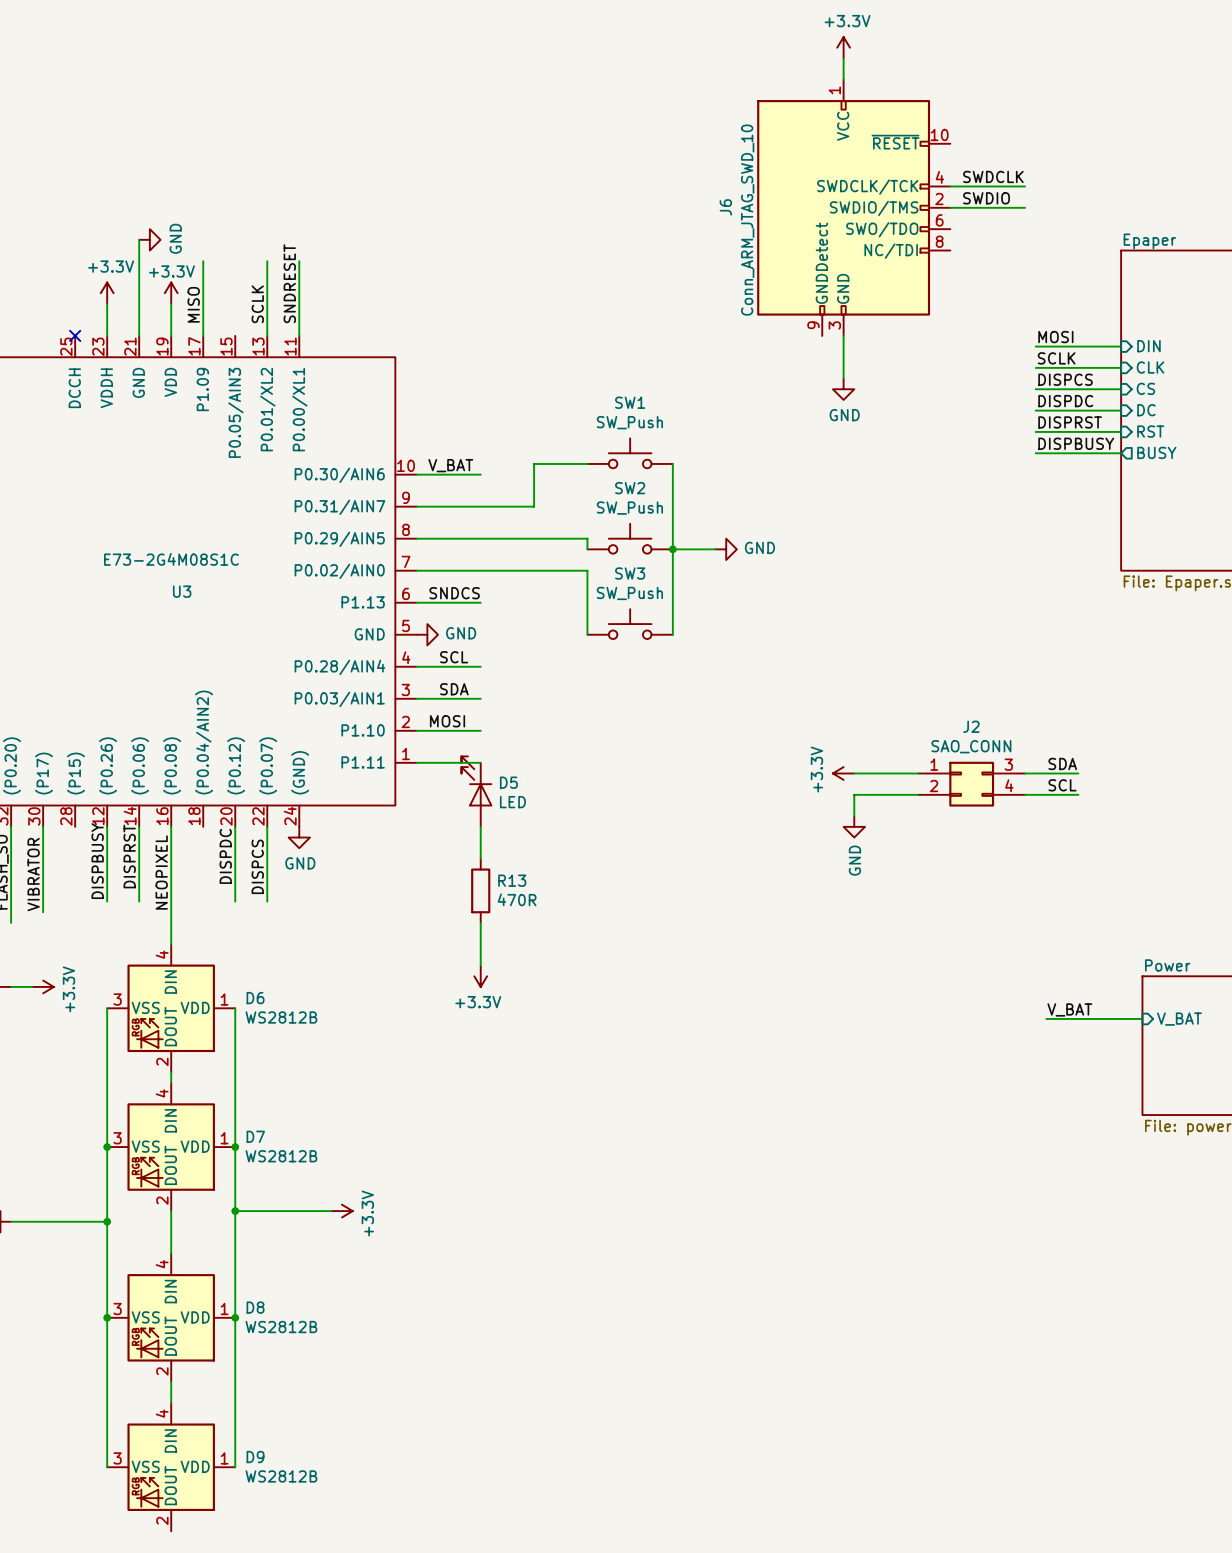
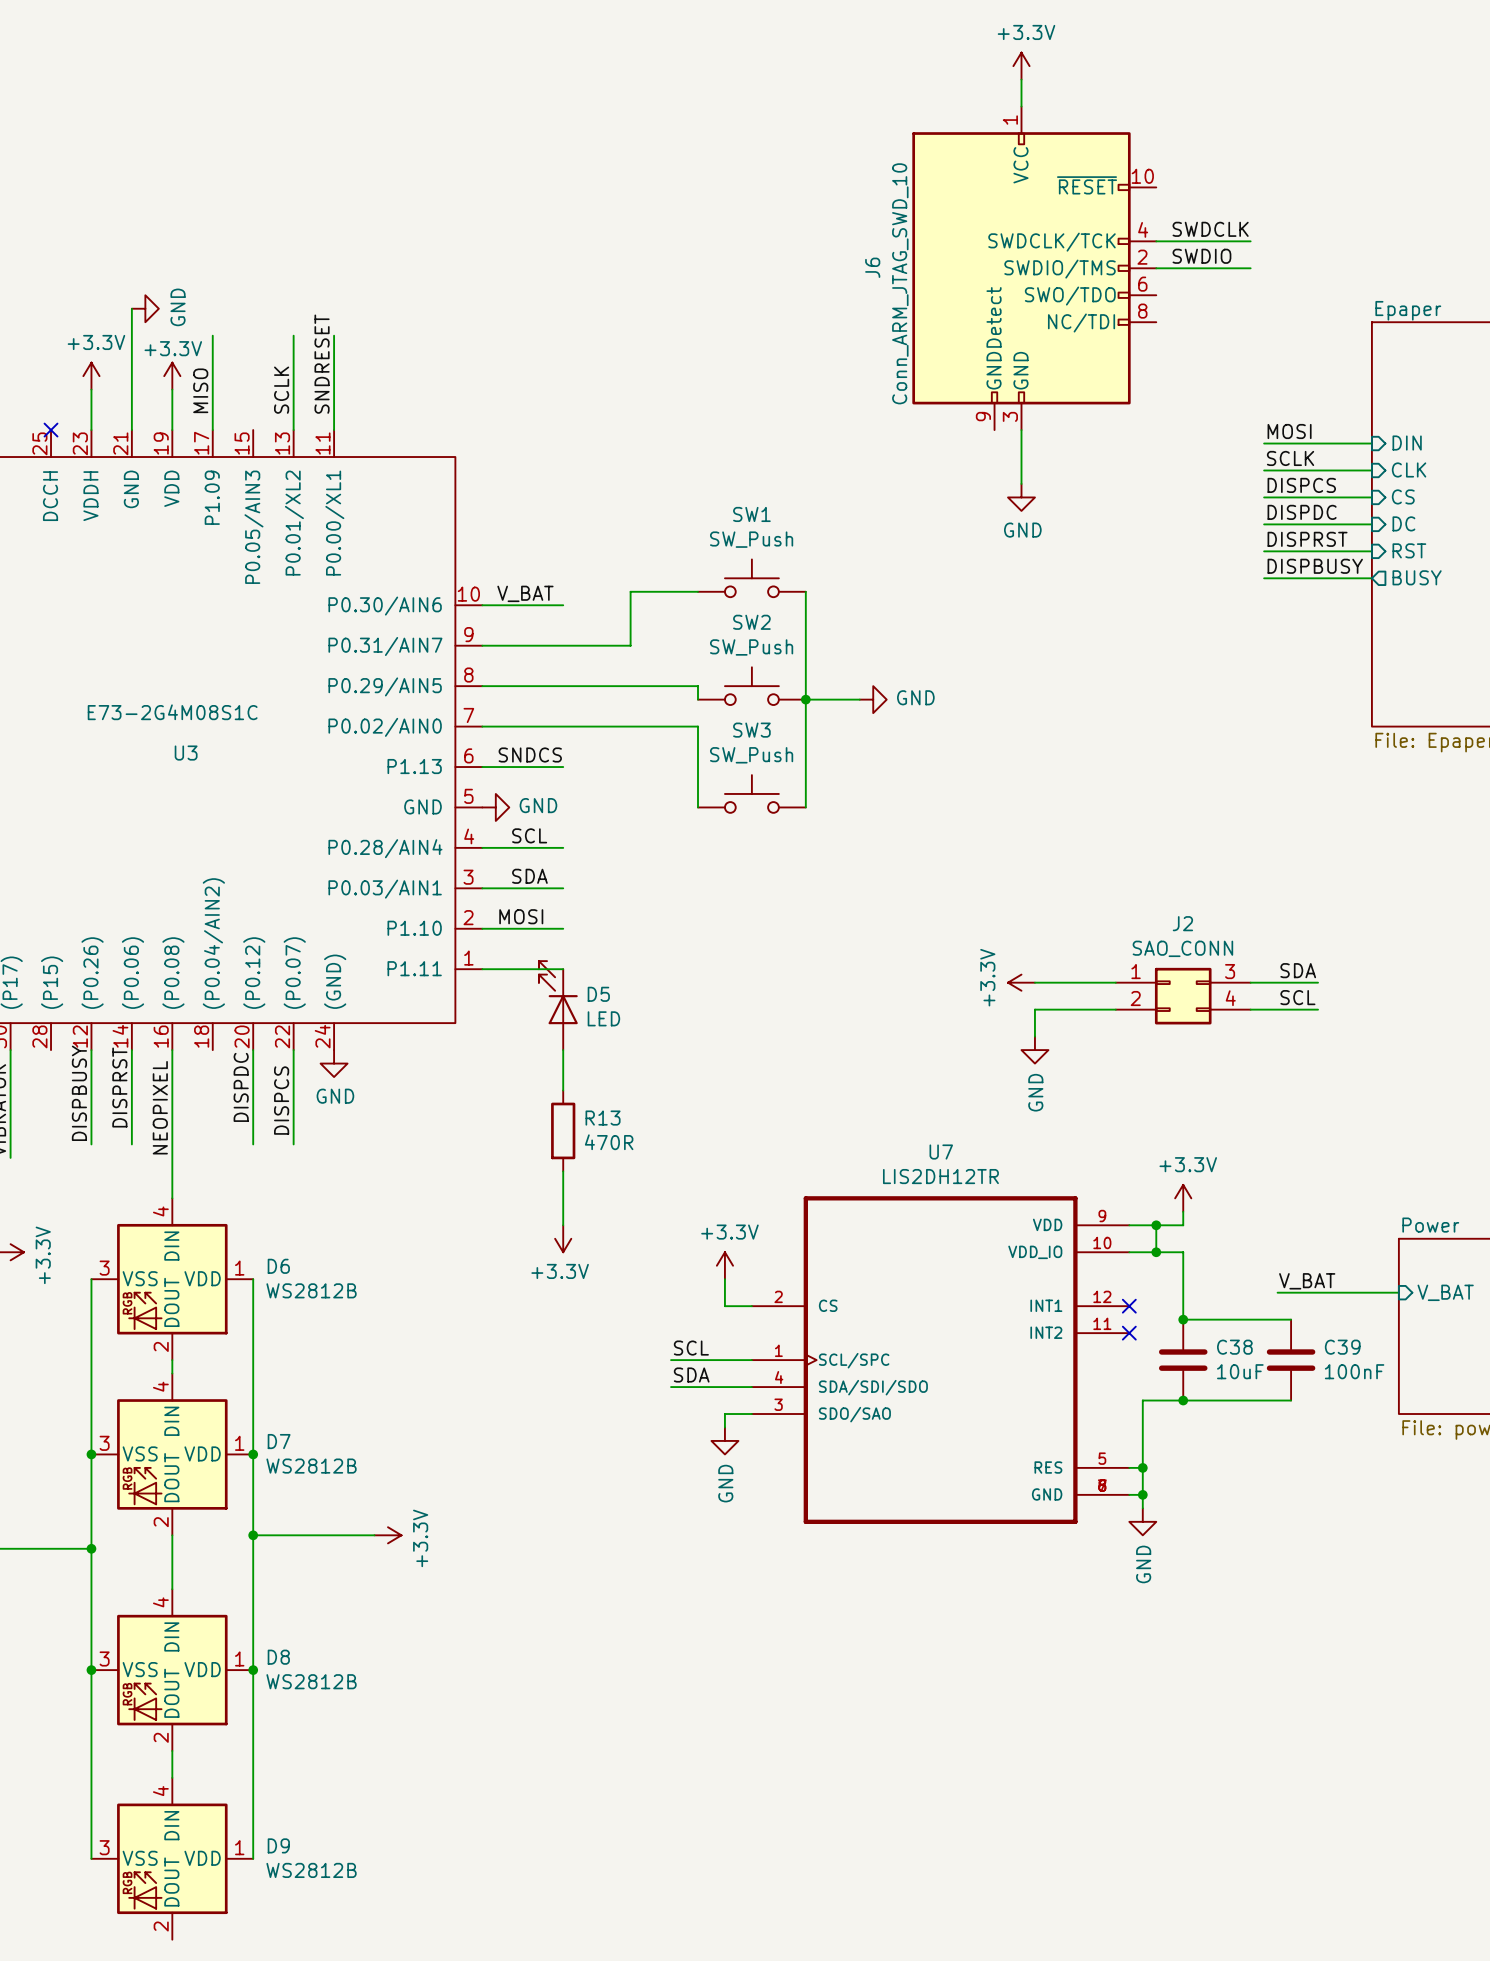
power symbol: none -> +3.3V (1183, 1198)
wire: none -> (1183, 1211) (1183, 1225) (1129, 1225)
wire: none -> (1156, 1225) (1156, 1252)
junction: none -> (1156, 1225)
wire: none -> (1129, 1252) (1183, 1252) (1183, 1319) (1291, 1319)
junction: none -> (1156, 1252)
power symbol: none -> +3.3V (724, 1265)
wire: none -> (724, 1279) (724, 1306) (751, 1306)
no-connect mark: none -> (1129, 1306)
junction: none -> (1183, 1319)
no-connect mark: none -> (1129, 1333)
label: none -> SCL (691, 1348)
wire: none -> (671, 1360) (751, 1360)
U7: none -> LIS2DH12TR (940, 1360)
C38: none -> 10uF (1183, 1360)
C39: none -> 100nF (1291, 1360)
label: none -> SDA (691, 1375)
wire: none -> (671, 1387) (751, 1387)
junction: none -> (1183, 1400)
wire: none -> (1291, 1400) (1142, 1400) (1142, 1508)
wire: none -> (751, 1414) (724, 1414) (724, 1427)
power symbol: none -> GND (724, 1440)
wire: none -> (1129, 1467) (1142, 1467)
junction: none -> (1142, 1467)
wire: none -> (1129, 1494) (1142, 1494)
junction: none -> (1142, 1494)
power symbol: none -> GND (1142, 1521)

